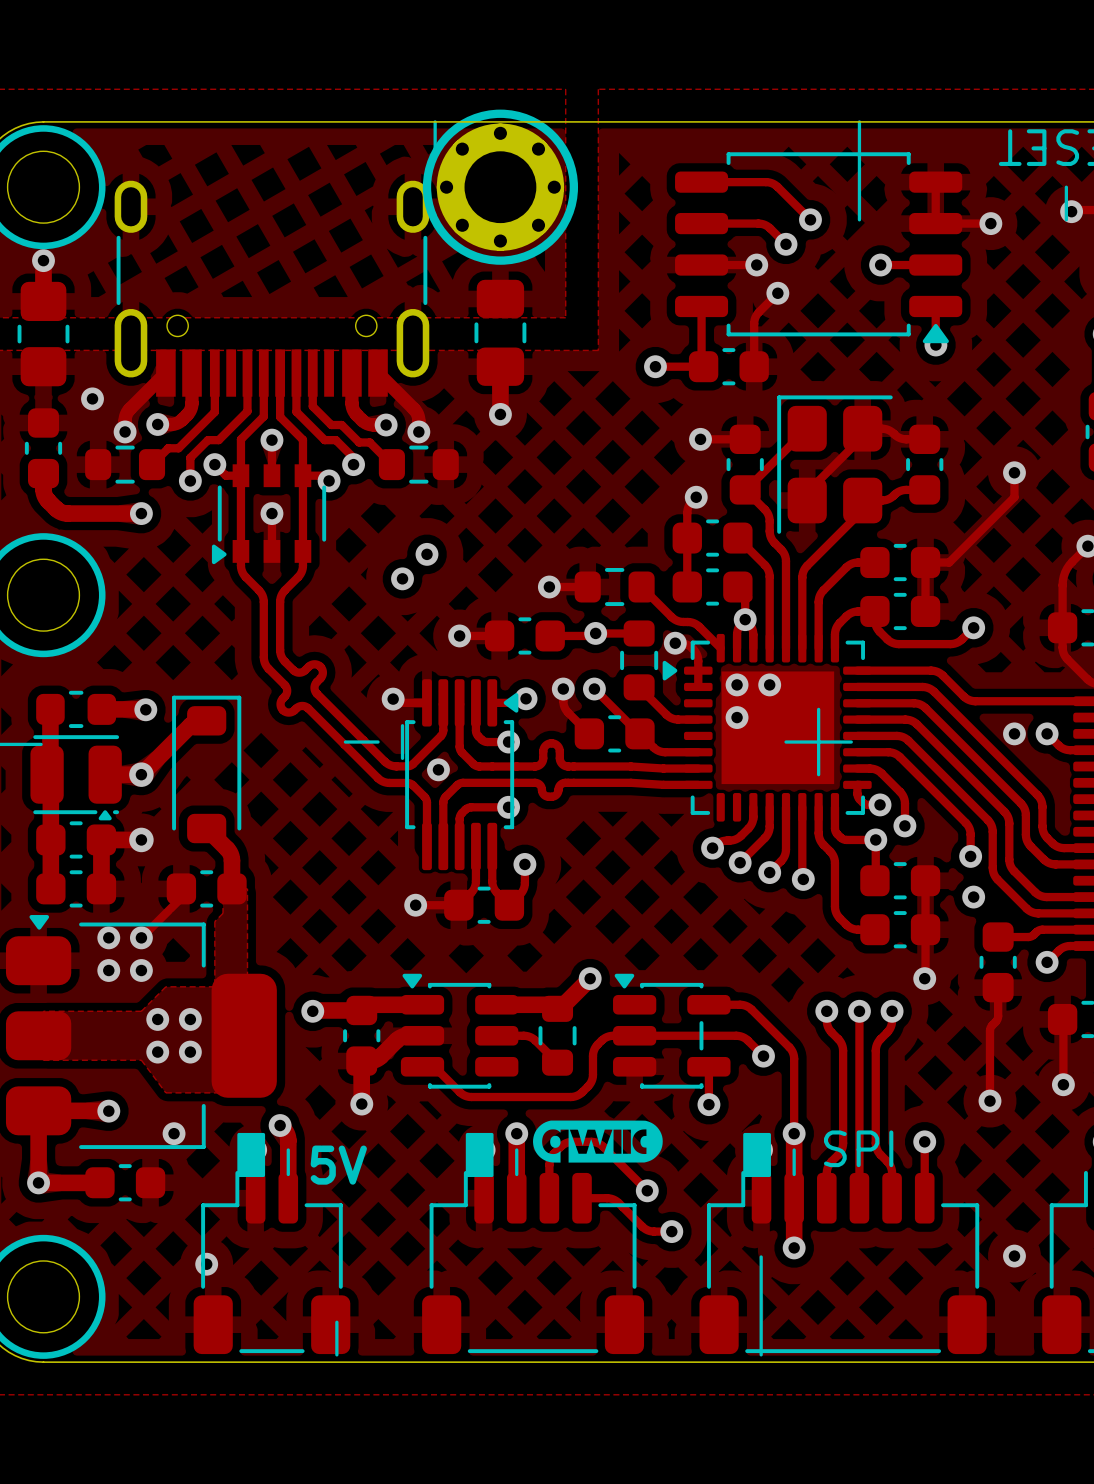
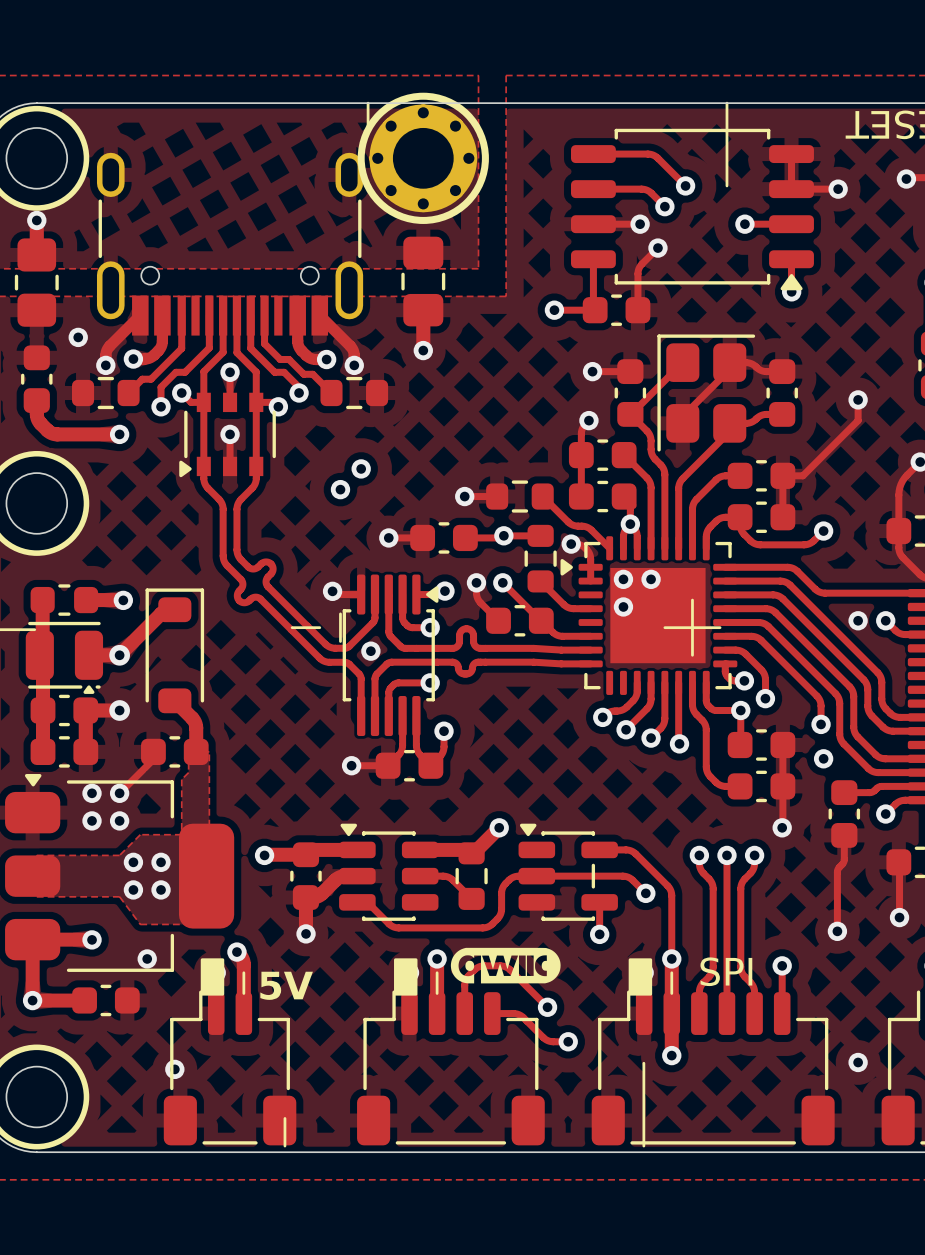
line: (1066, 187) (1066, 219) -> none

